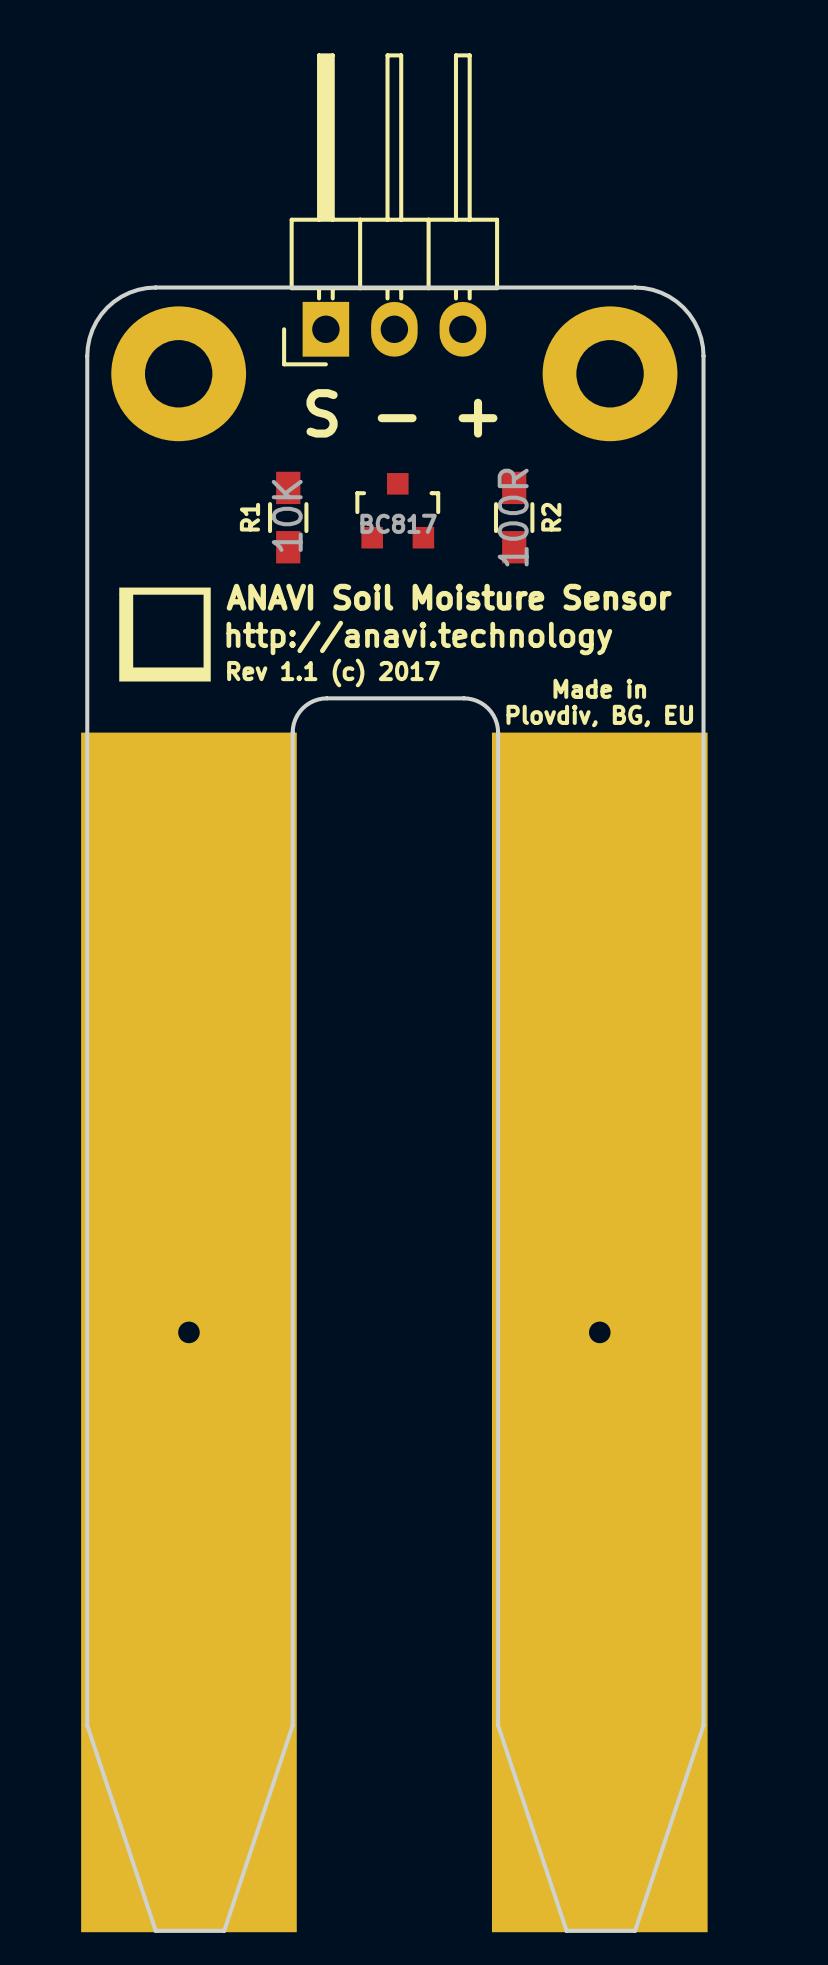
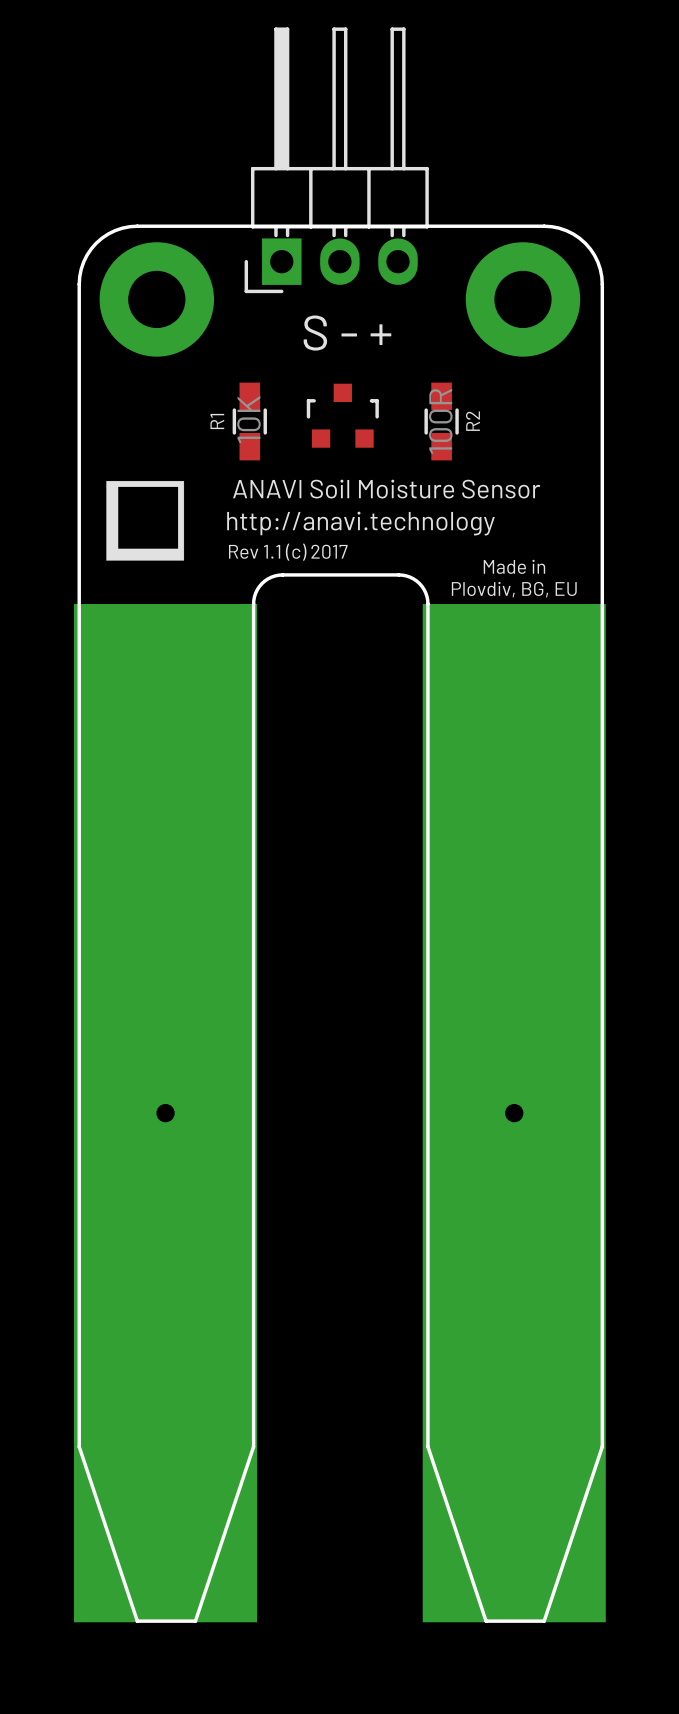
text: BC817 (398, 523) -> none

